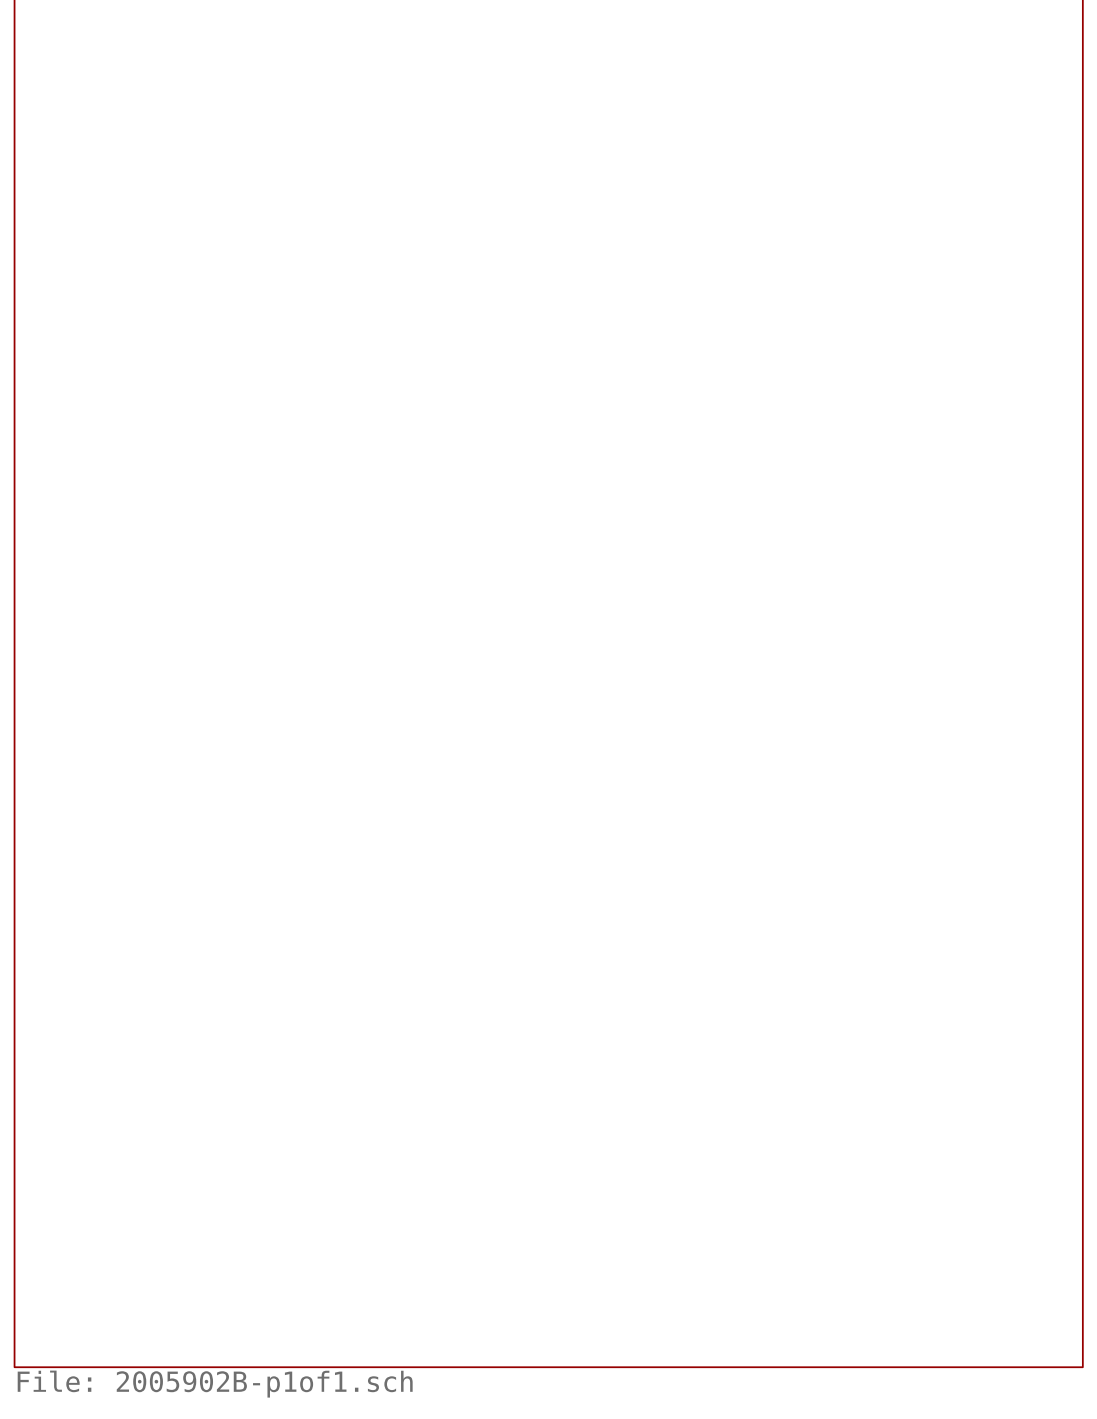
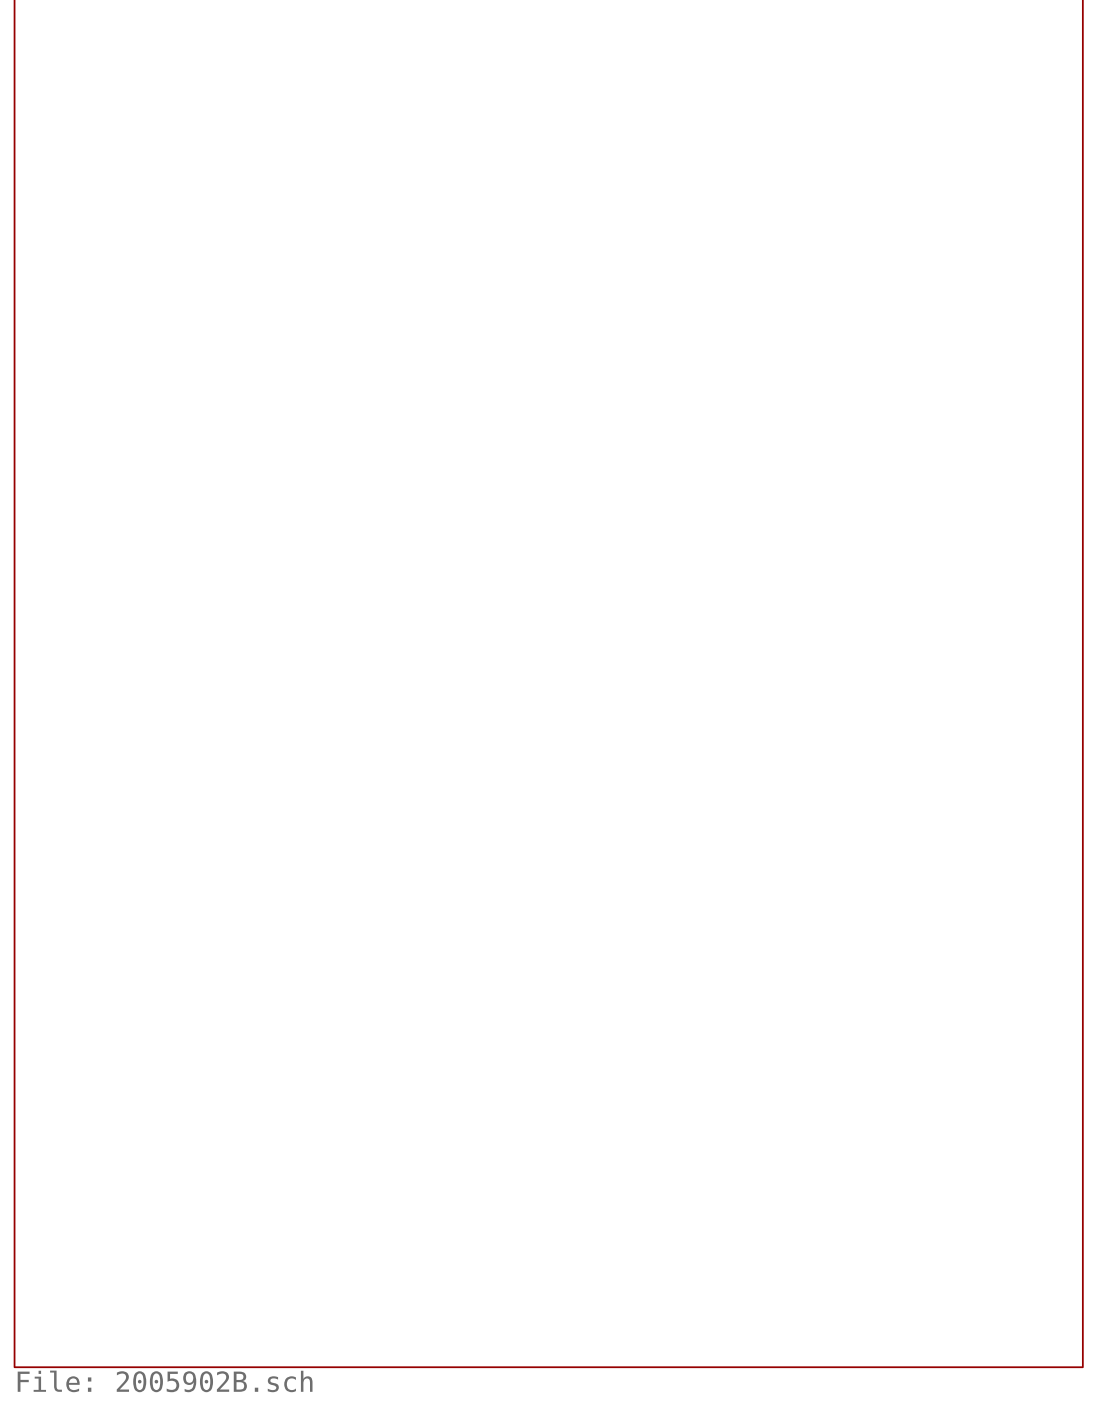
sheet value: File: 2005902B-p1of1.sch (215, 1384) -> File: 2005902B.sch (165, 1381)

